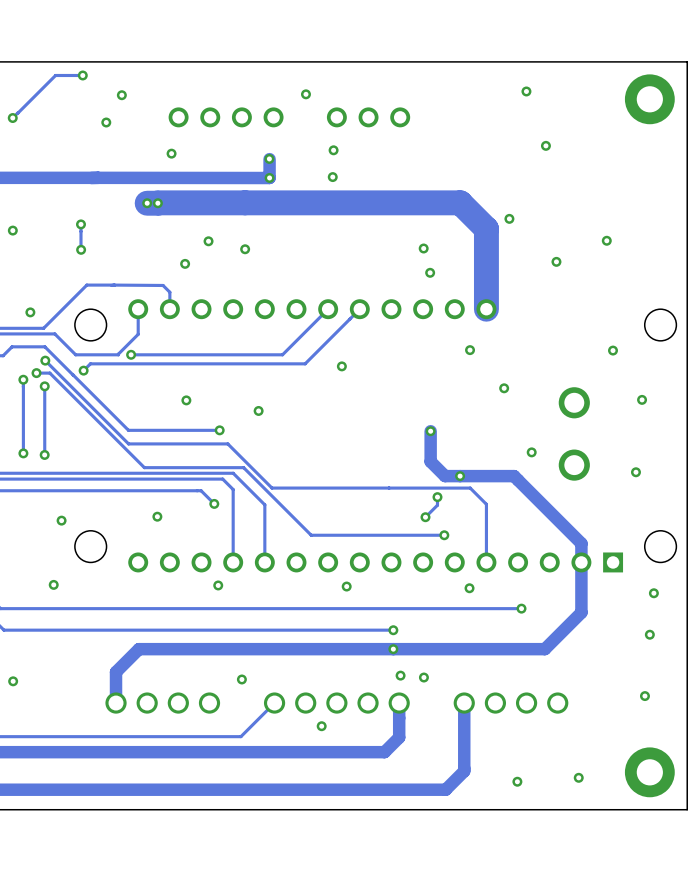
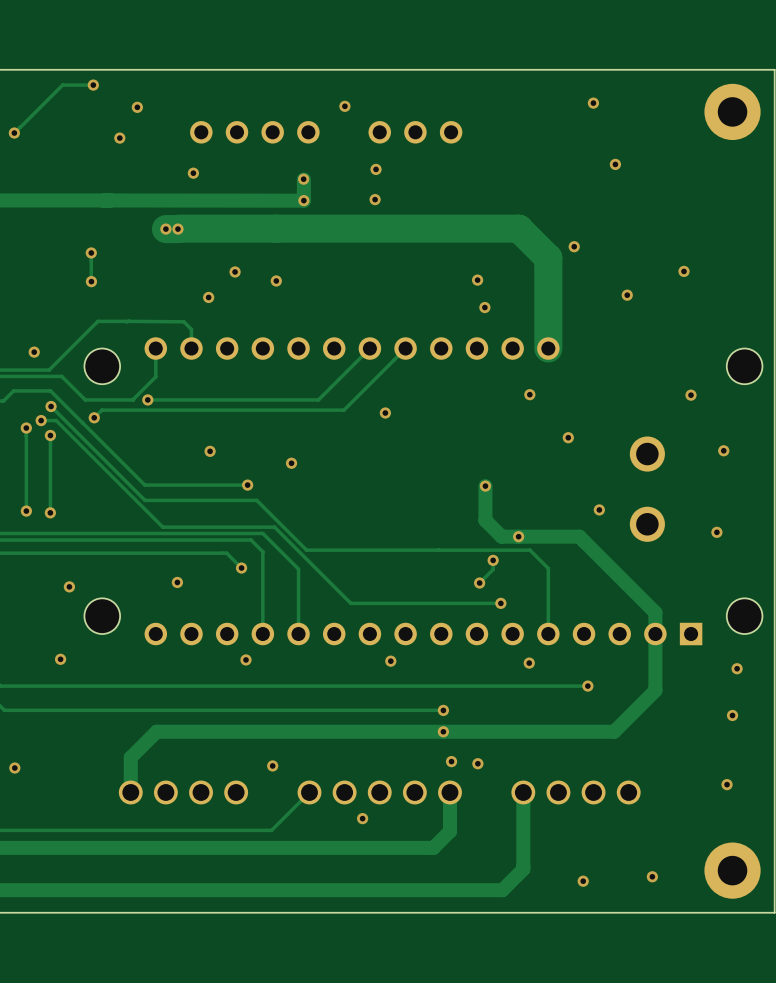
via: (12, 230) -> none

